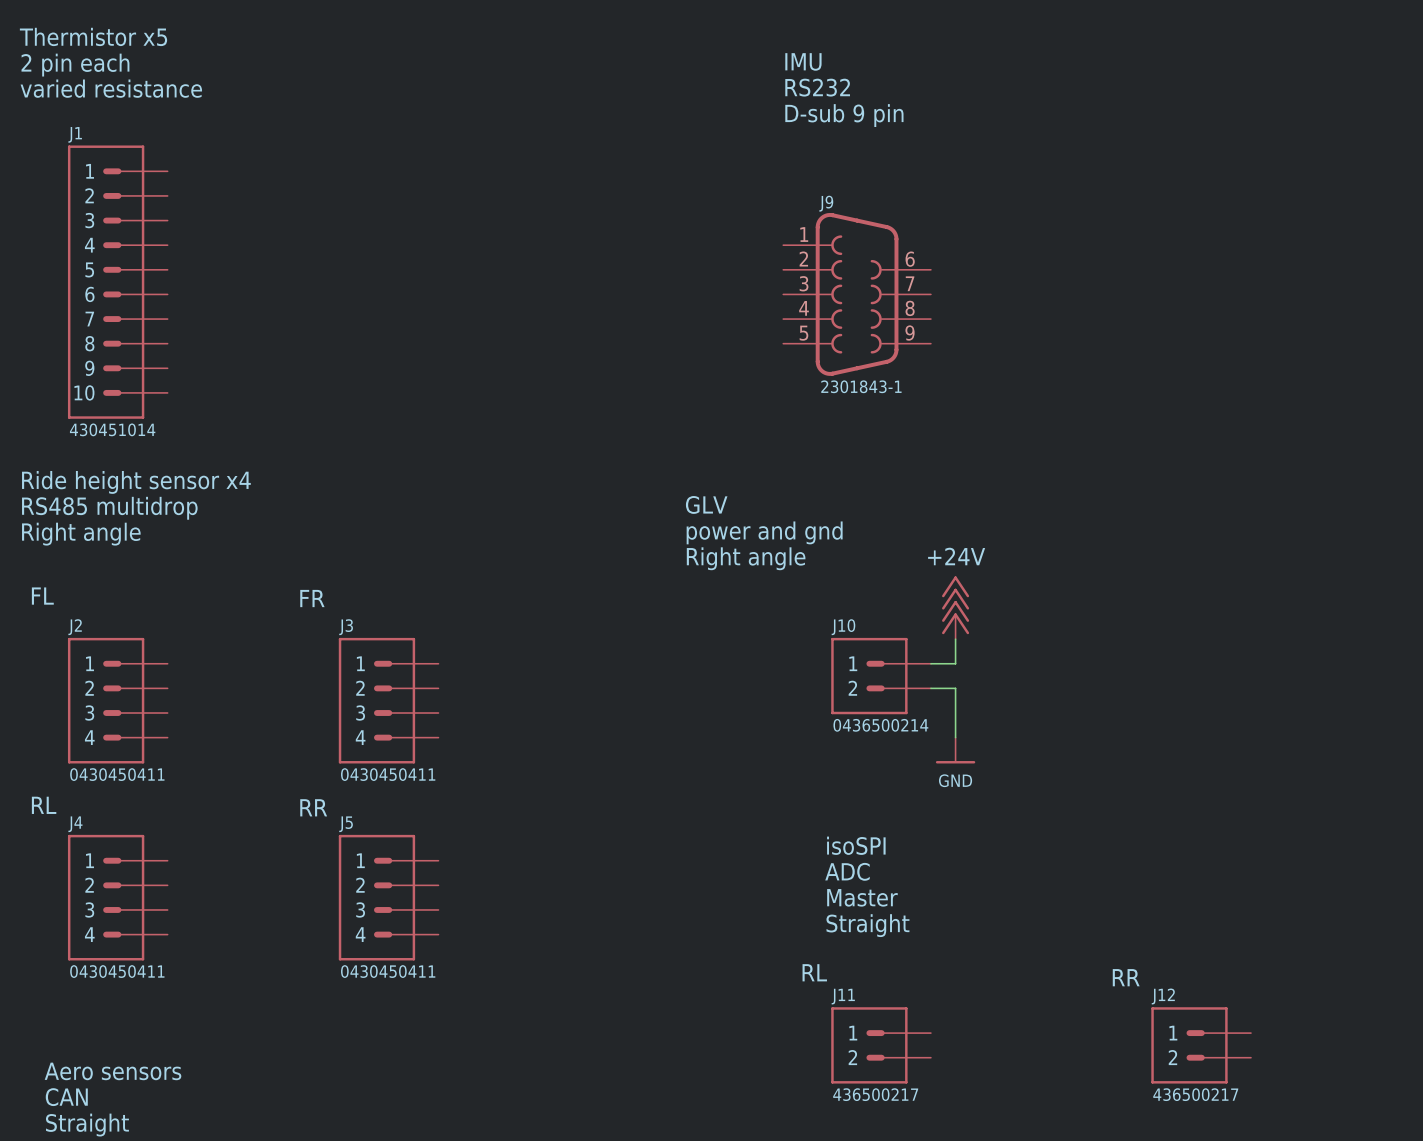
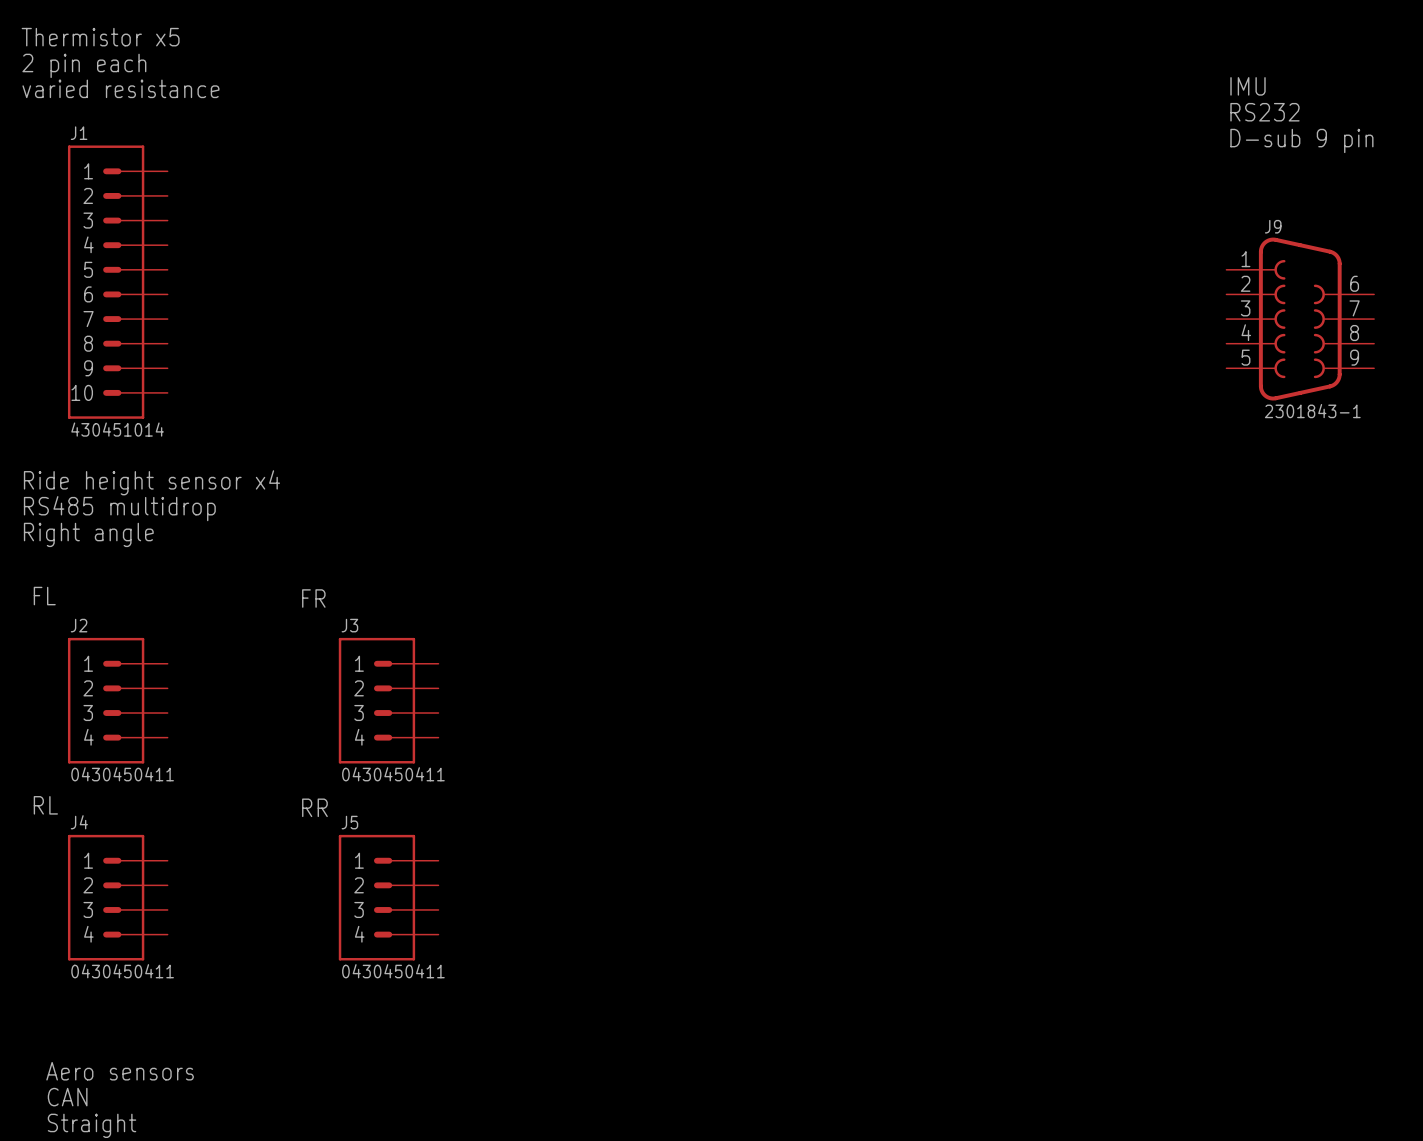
text: IMU (803, 61) -> none
text: none -> IMU (1247, 86)
text: RS232 (817, 87) -> none
text: none -> RS232 (1264, 112)
text: D-sub 9 pin (844, 115) -> none
text: none -> D-sub 9 pin (1301, 140)
J9 position: (857, 294) -> (1300, 319)
text: GLV (706, 504) -> none
text: power and gnd (764, 532) -> none
text: Right angle (746, 558) -> none
power symbol: +24V (955, 607) -> none
wire: (955, 639) (955, 663) (930, 663) -> none
J10: (881, 676) -> none
wire: (930, 688) (955, 688) (955, 737) -> none
power symbol: GND (955, 750) -> none
text: isoSPI (856, 845) -> none
text: ADC (847, 871) -> none
text: Master (862, 897) -> none
text: Straight (867, 925) -> none
text: RL (814, 972) -> none
text: RR (1126, 977) -> none
J11: (881, 1045) -> none
J12: (1201, 1045) -> none

